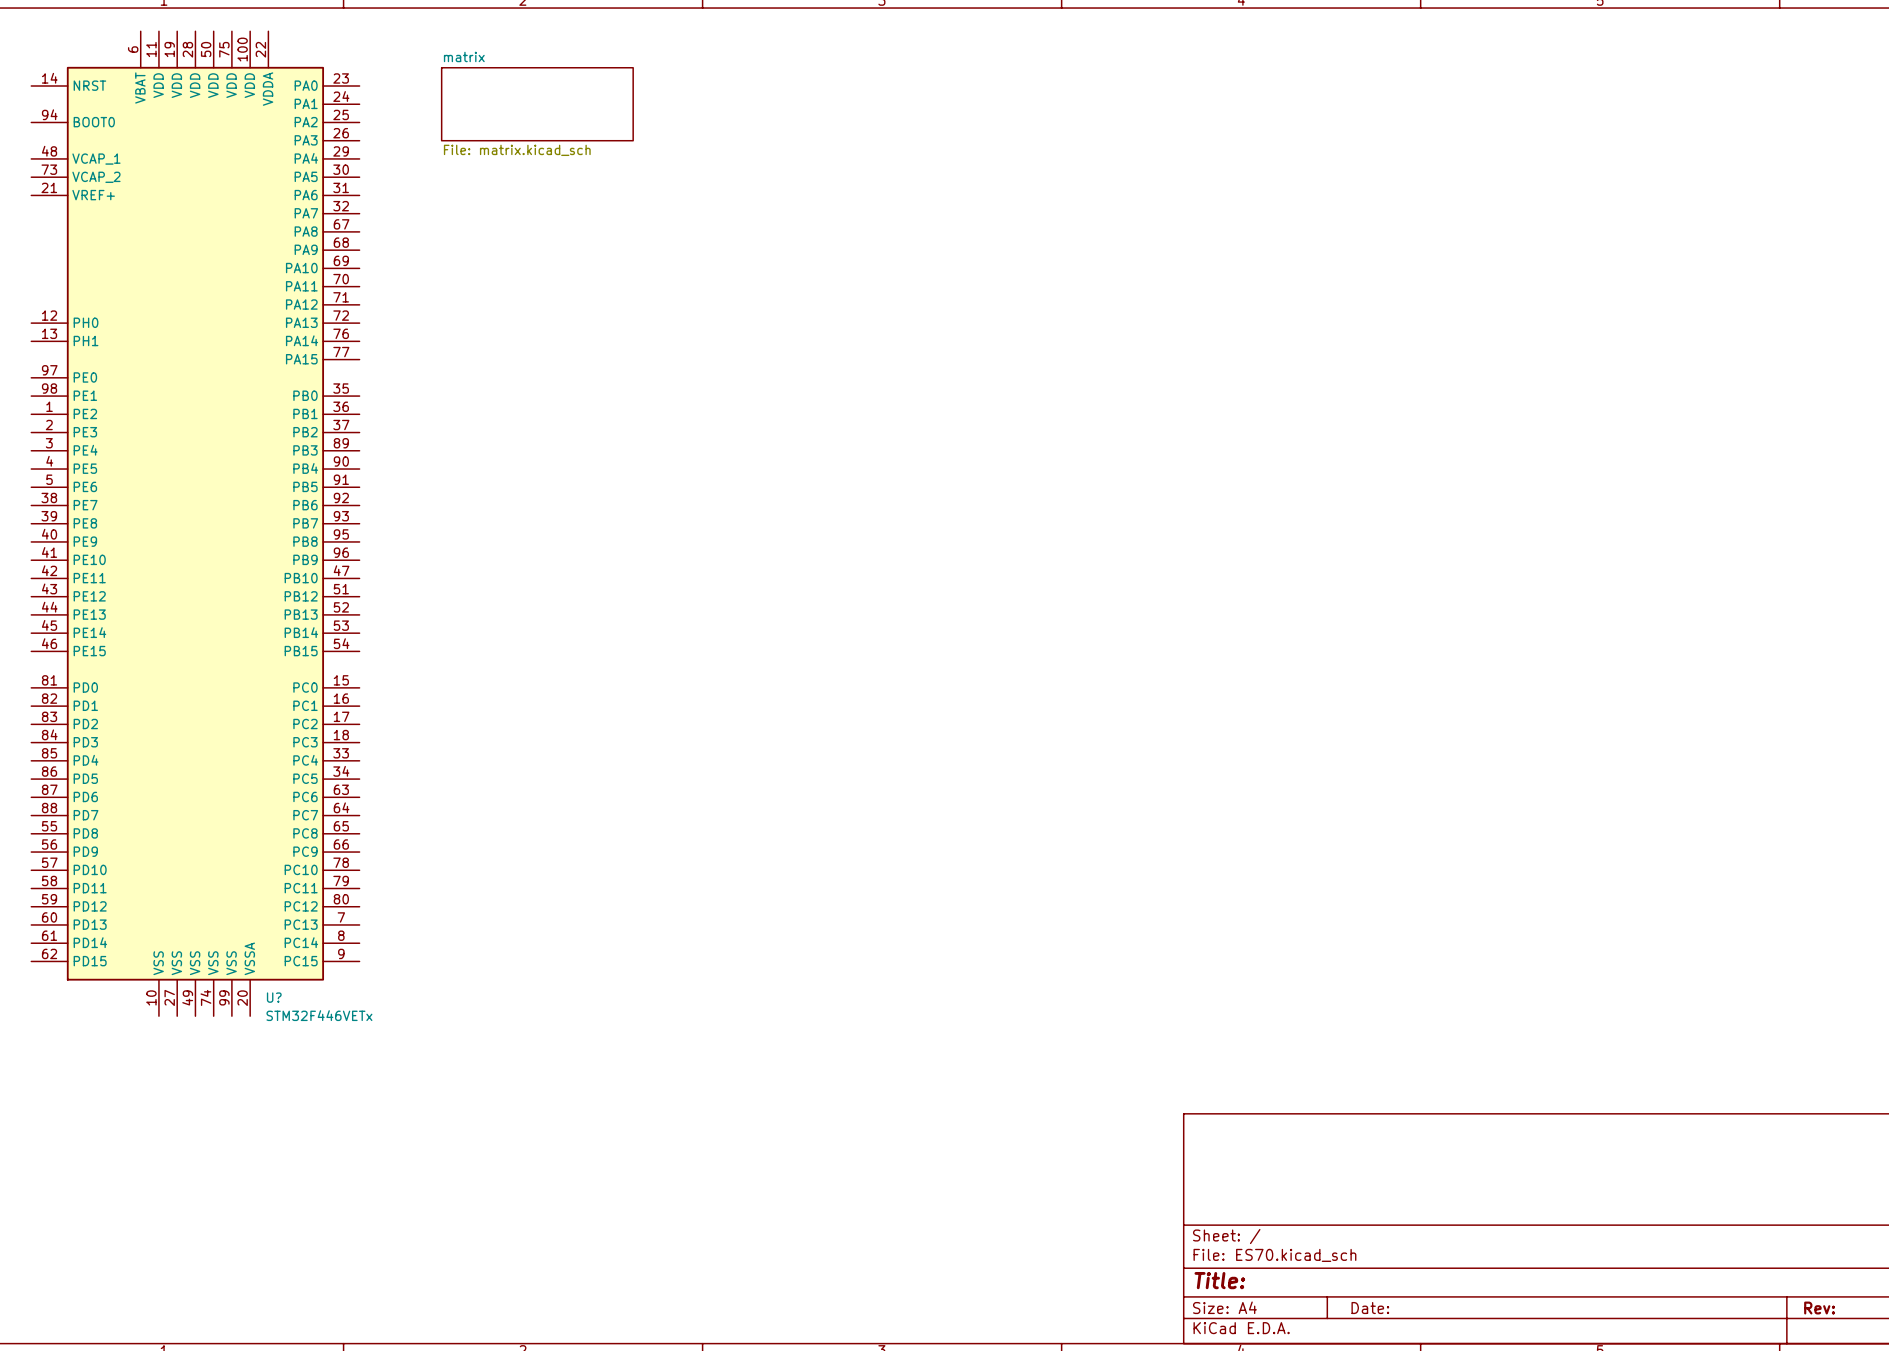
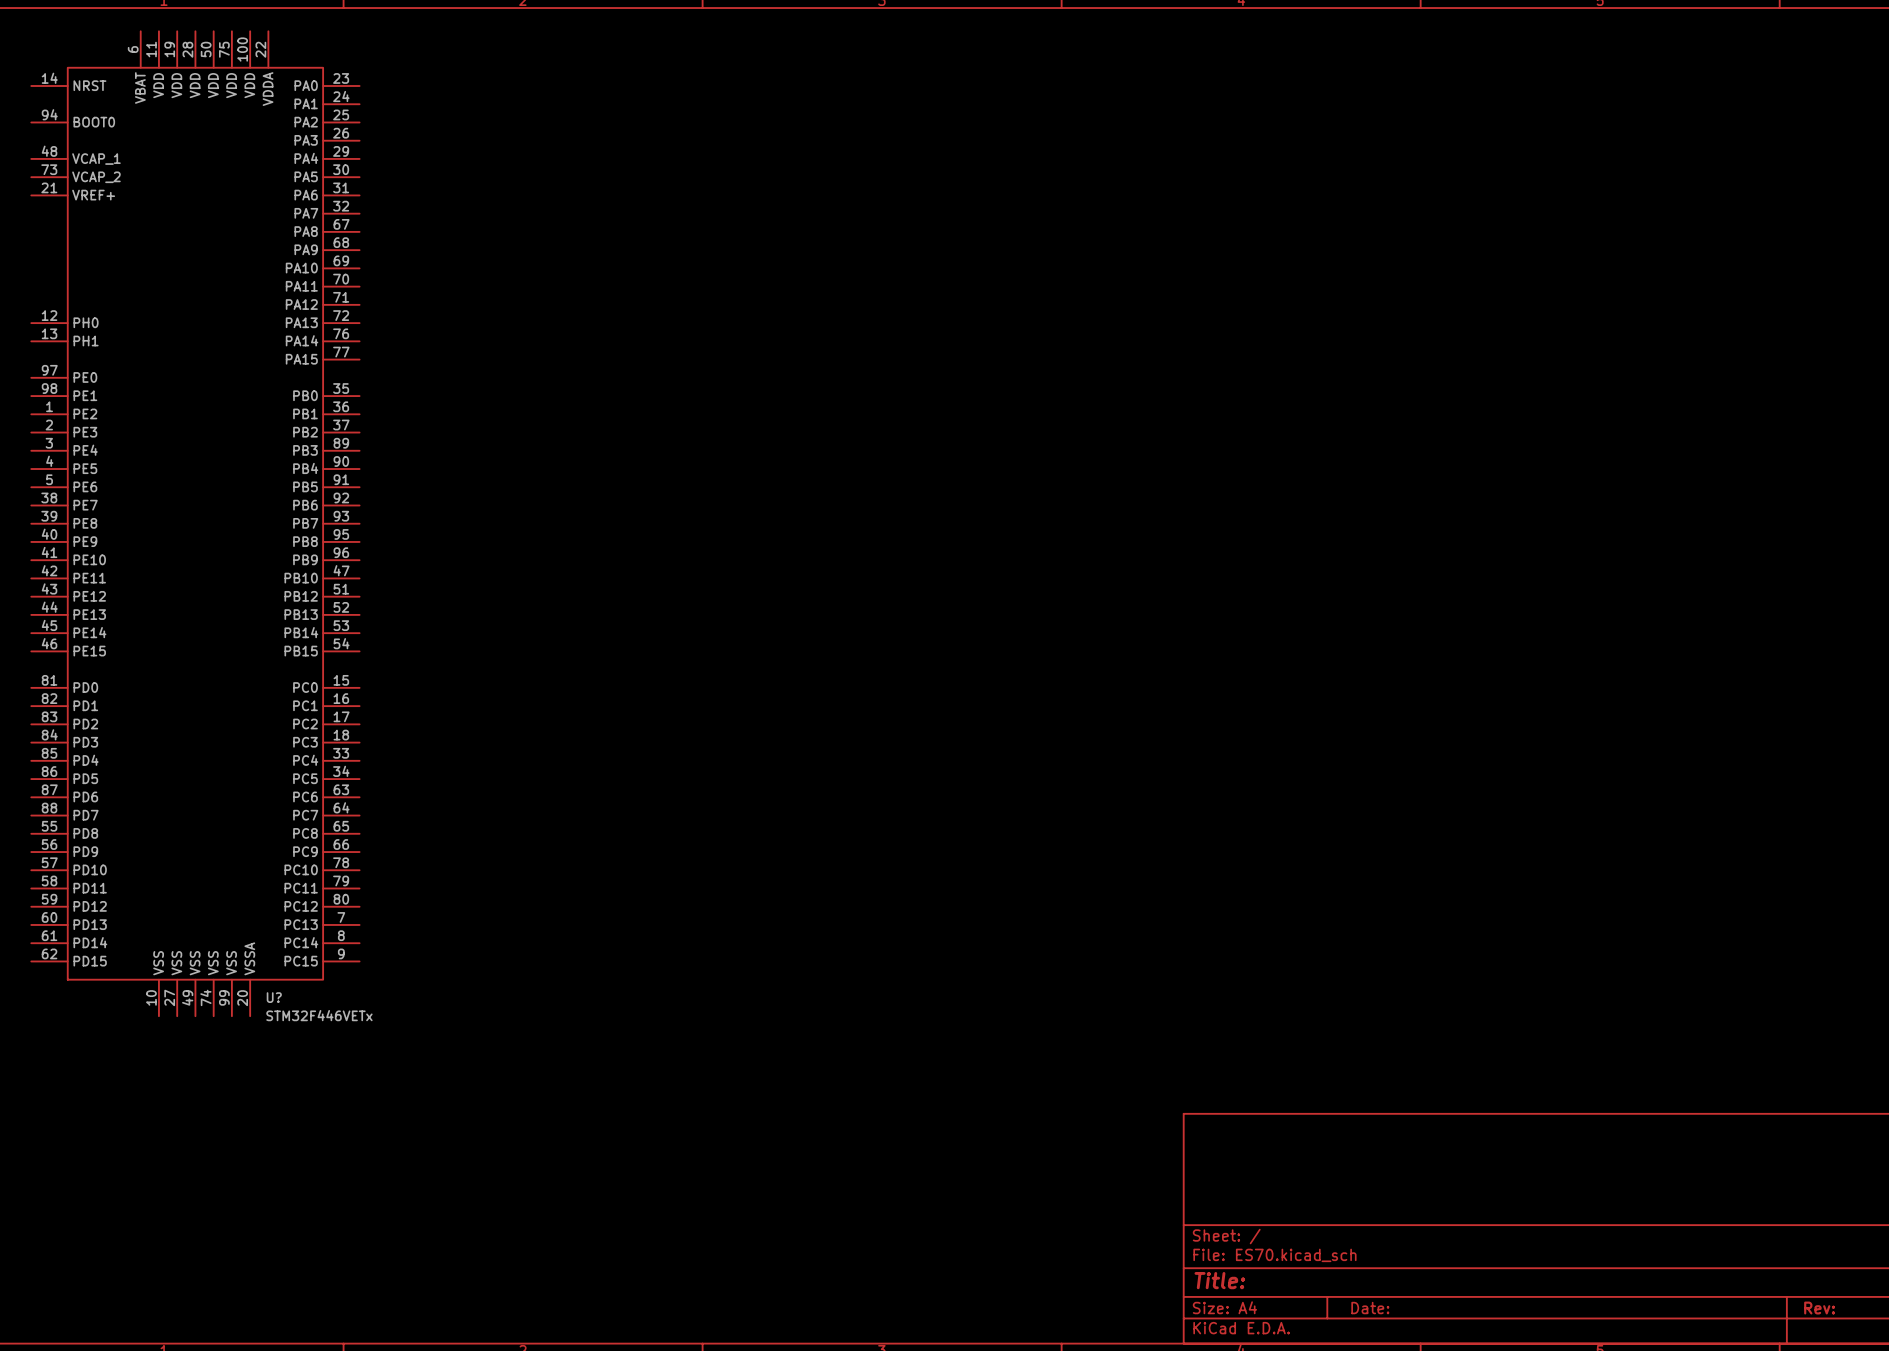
sheet matrix: File: matrix.kicad_sch (537, 104) -> none

